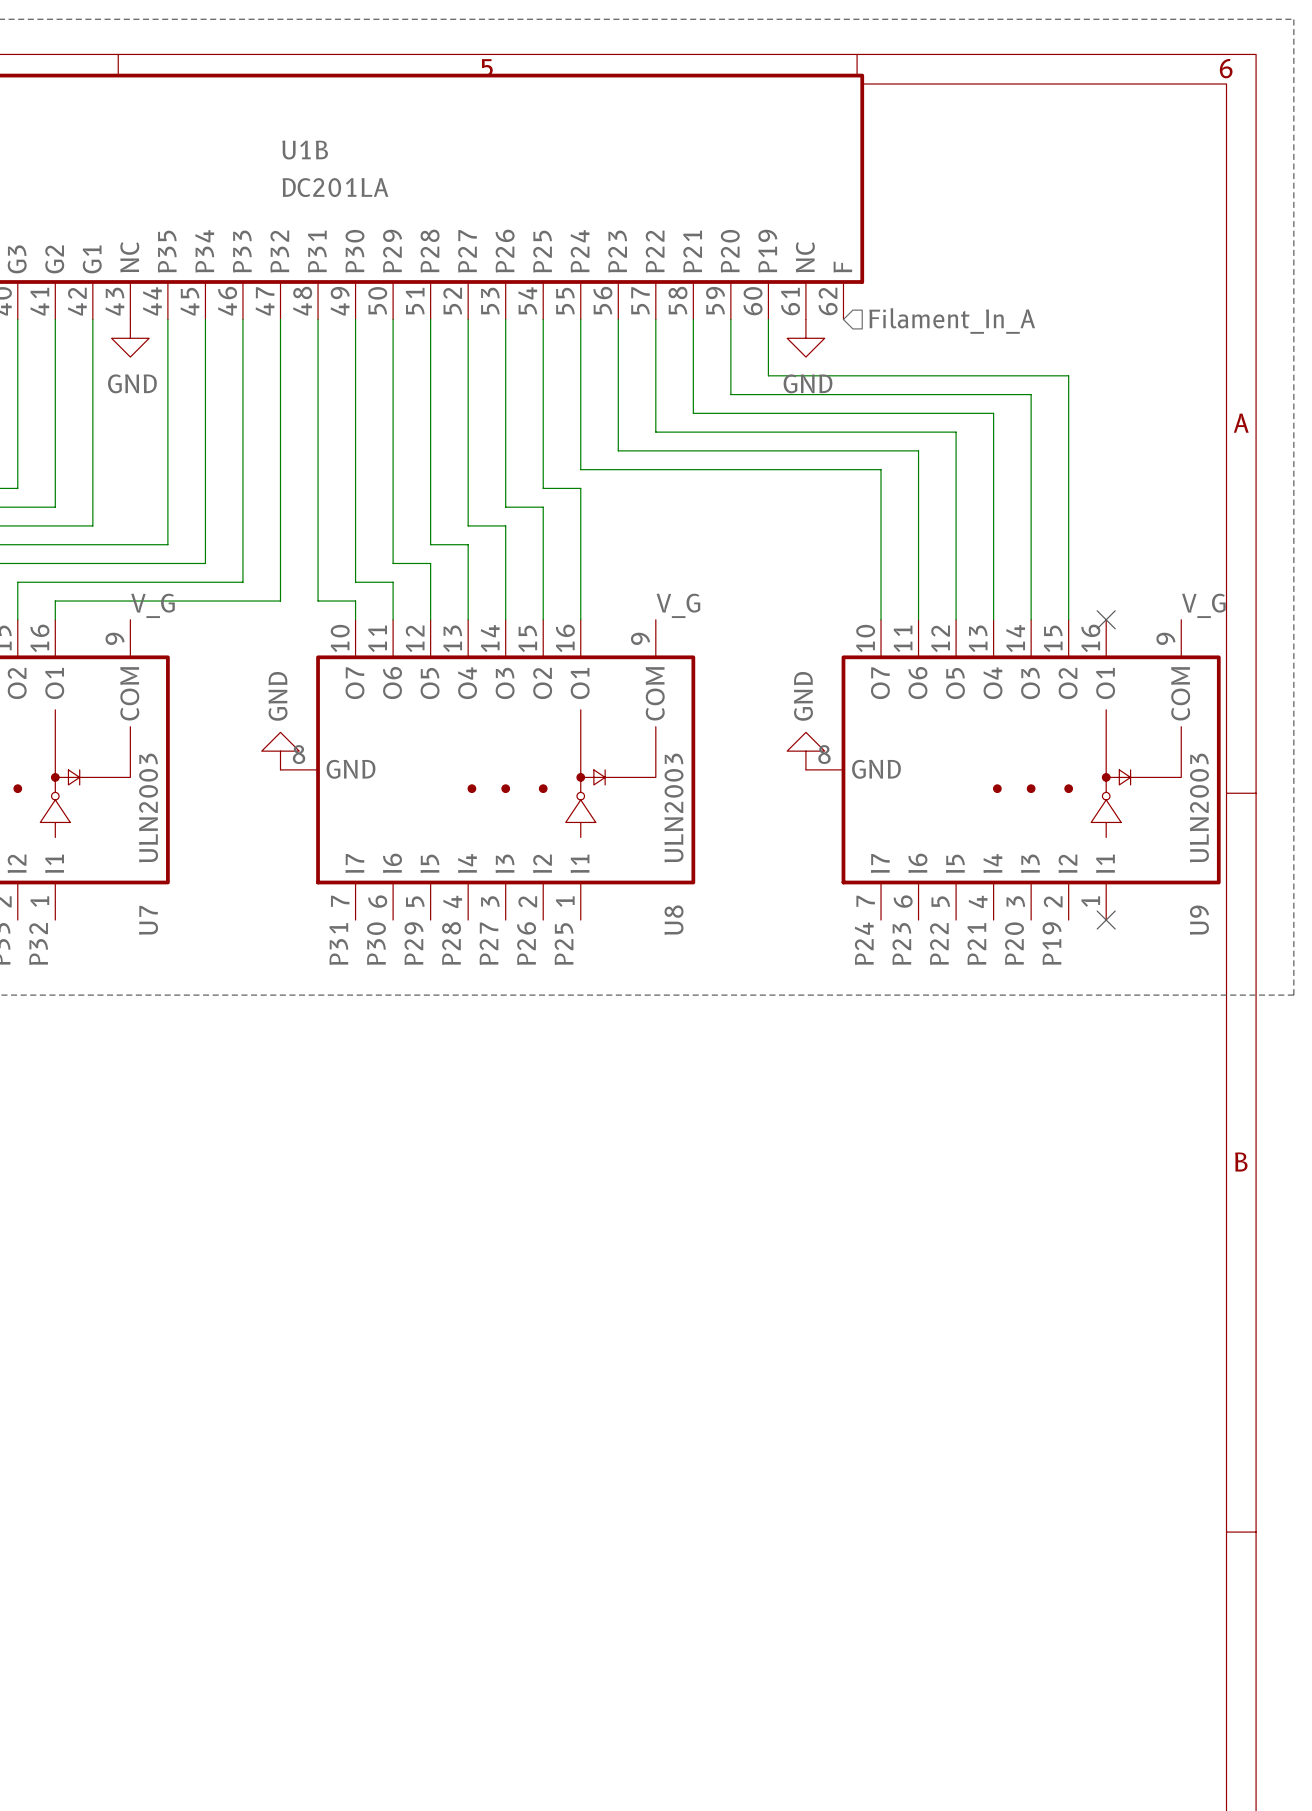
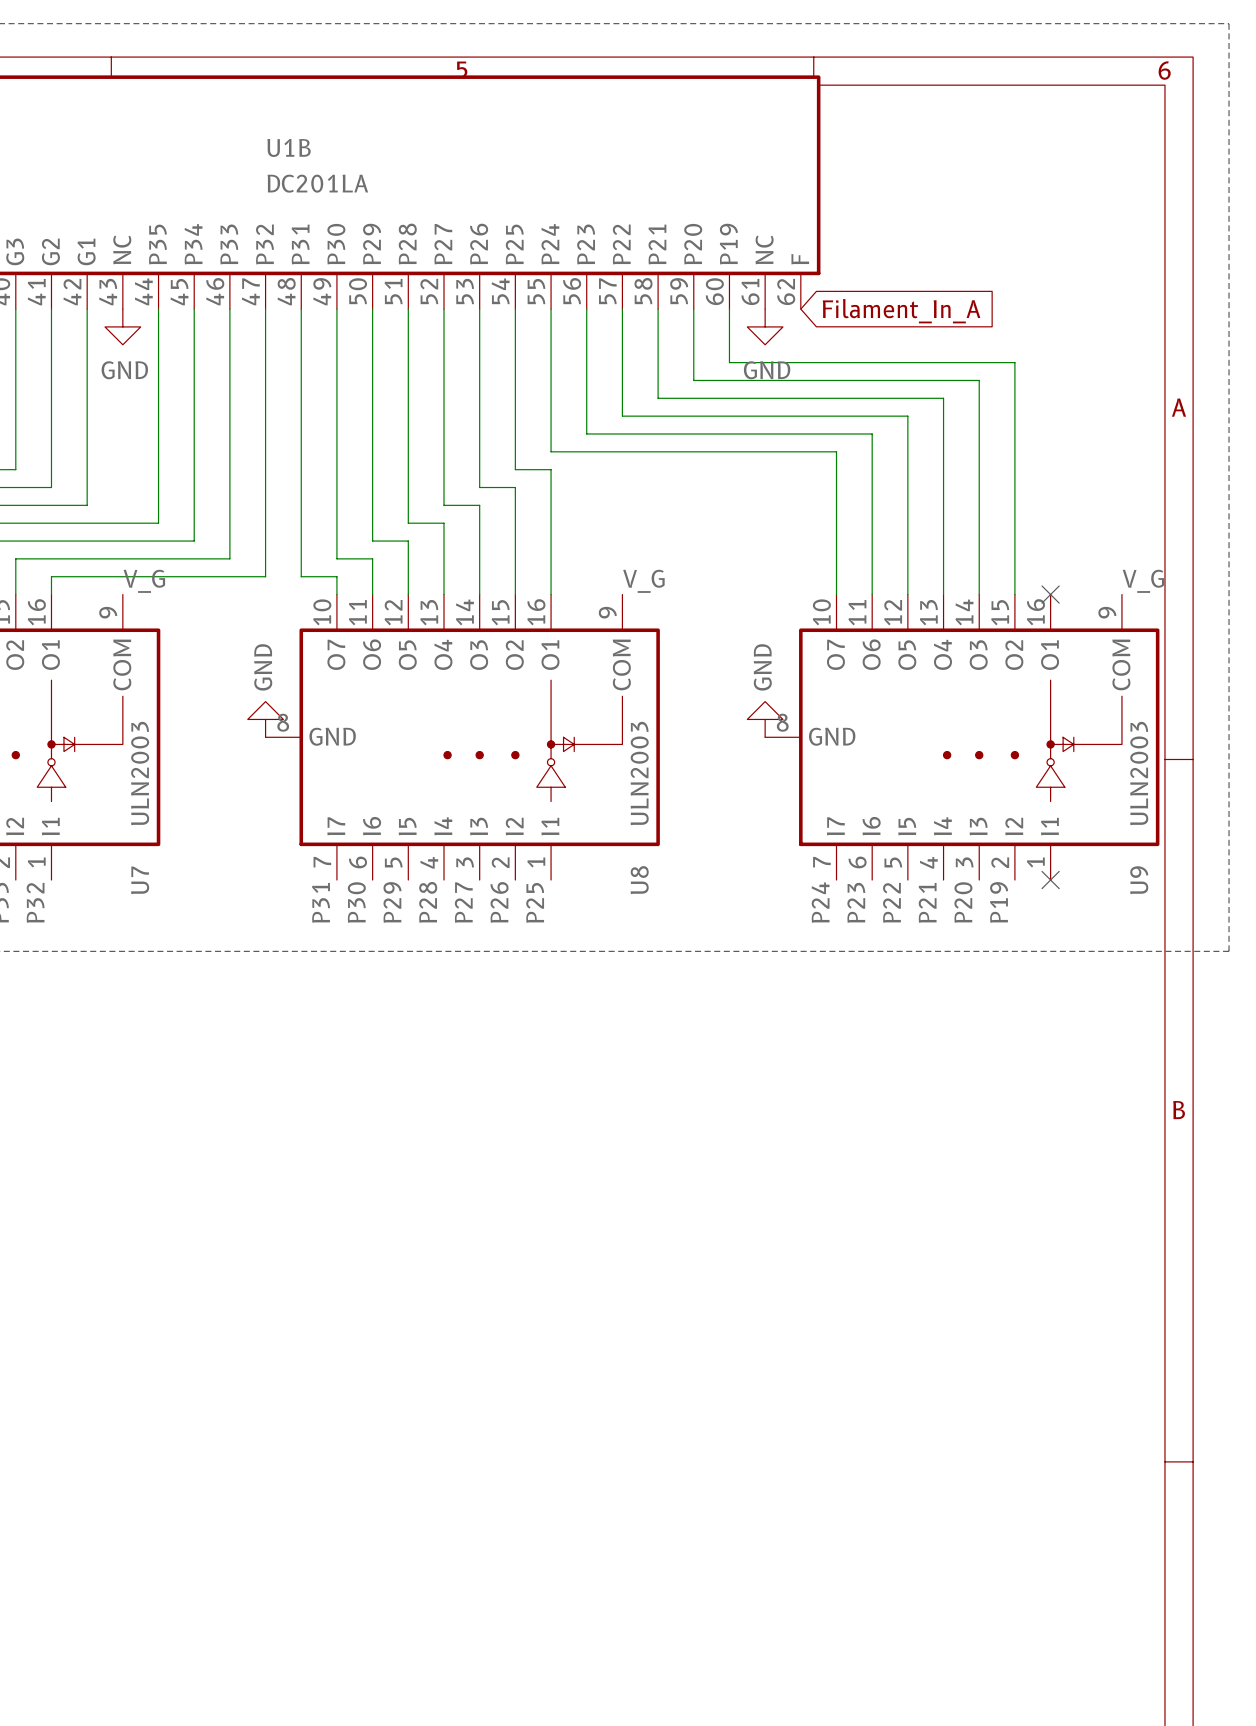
global label: none -> Filament_In_A (901, 311)
hierarchical label: Filament_In_A (952, 321) -> none

